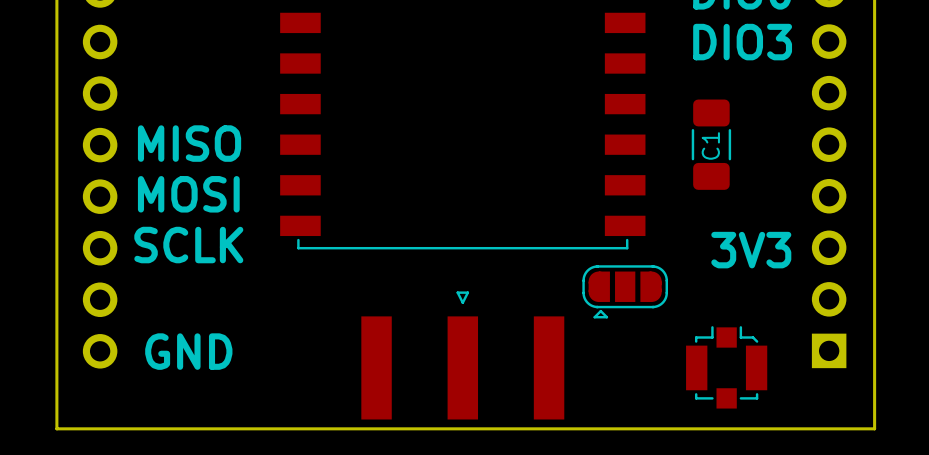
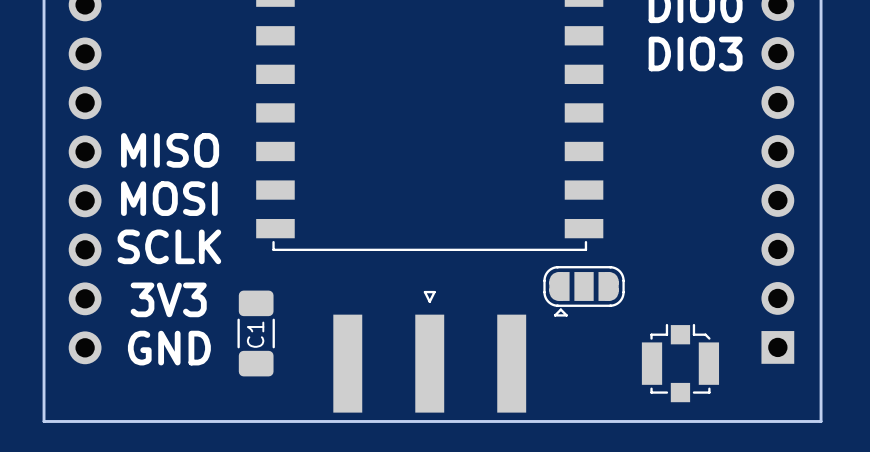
C1 position: (711, 144) -> (256, 333)
text: 3V3 (751, 250) -> none
text: none -> 3V3 (168, 299)

